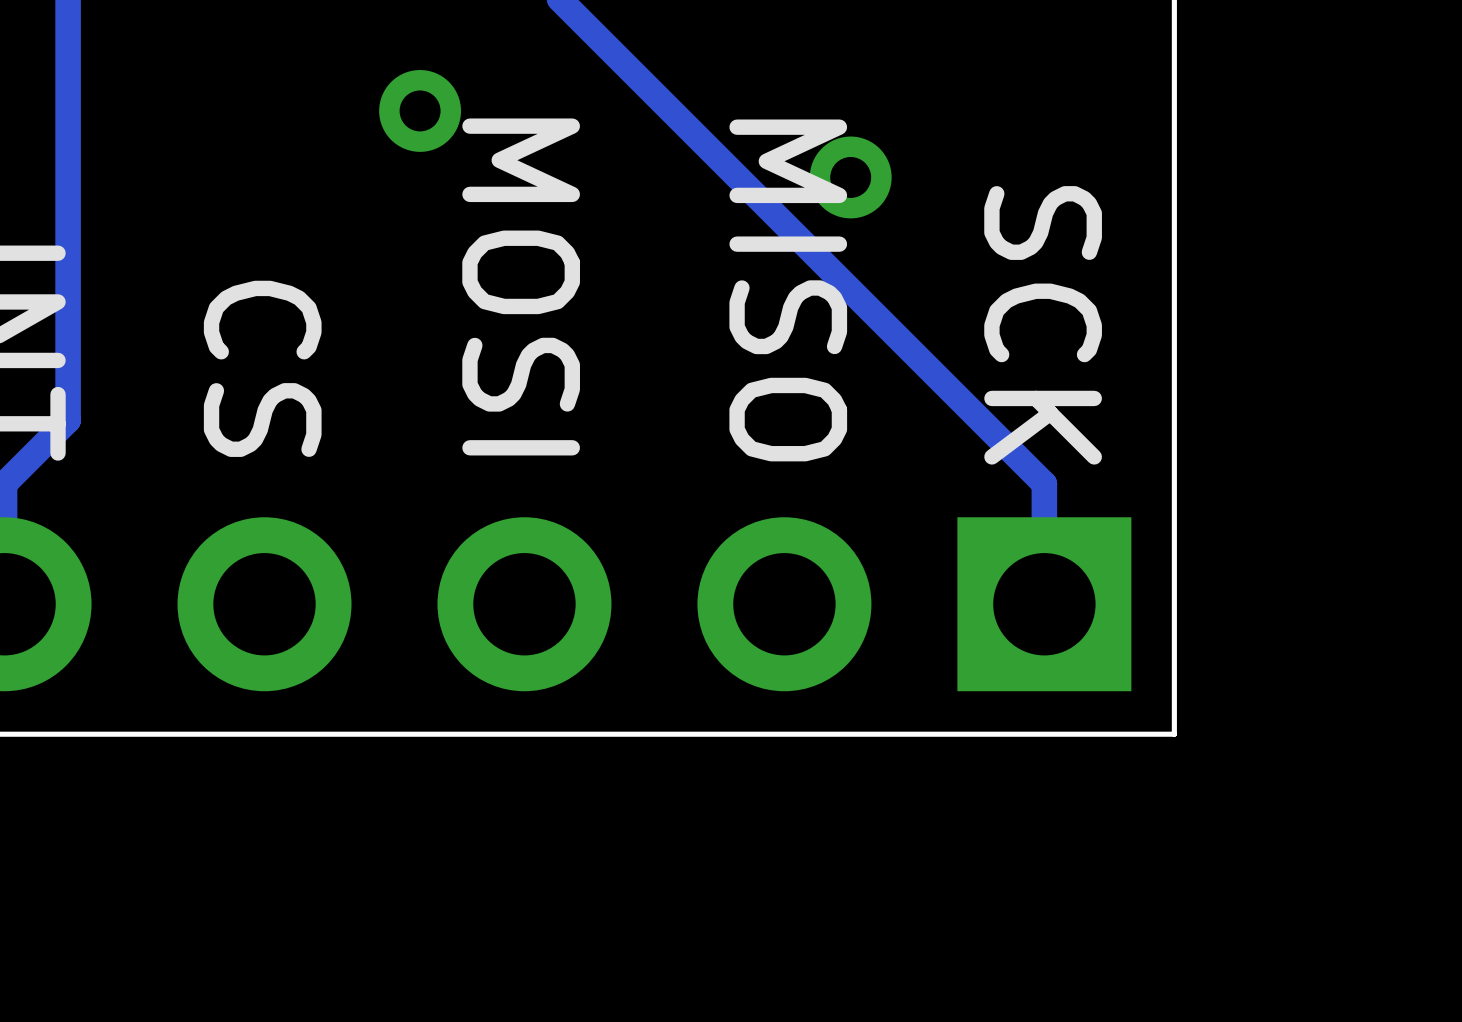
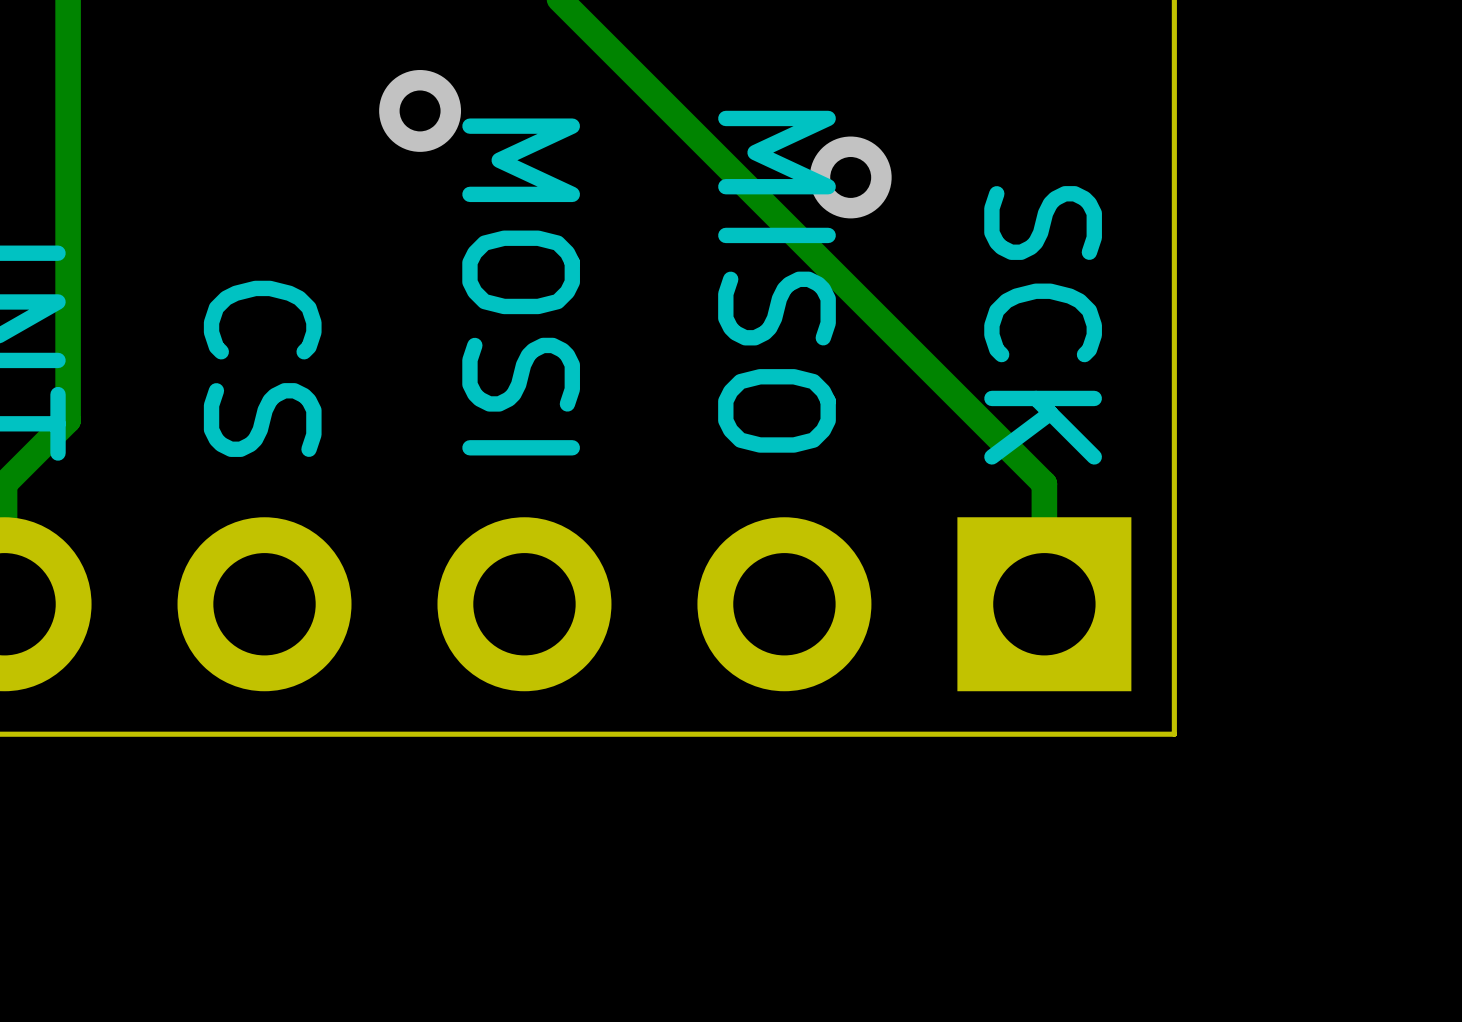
text position: MISO (788, 290) -> MISO (777, 281)

